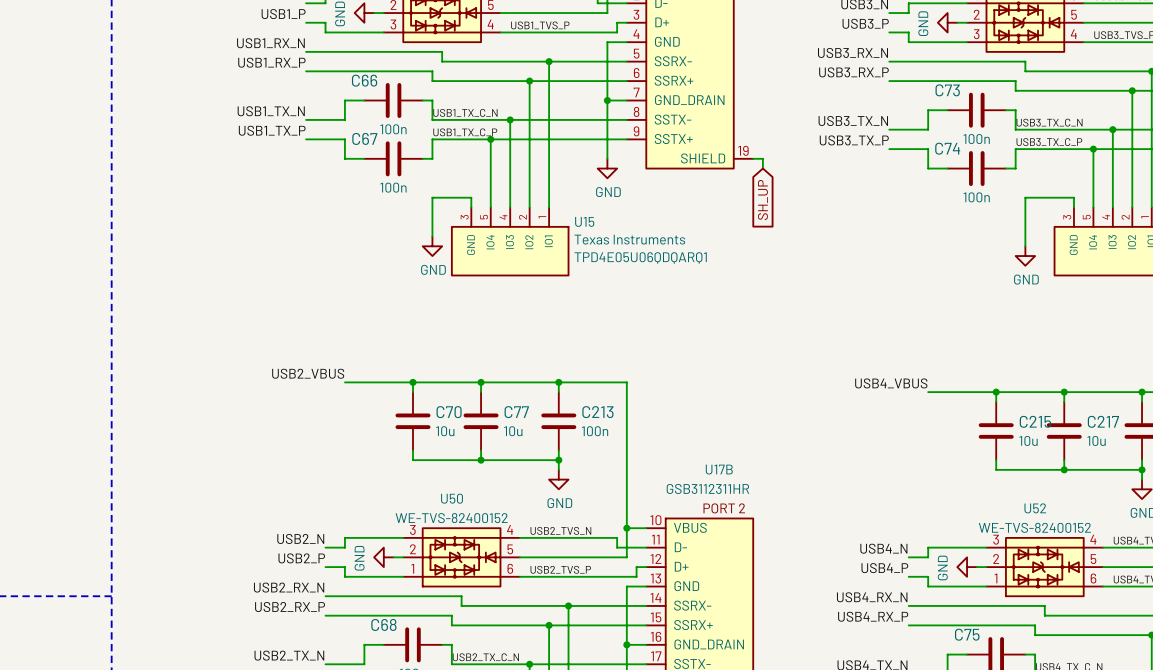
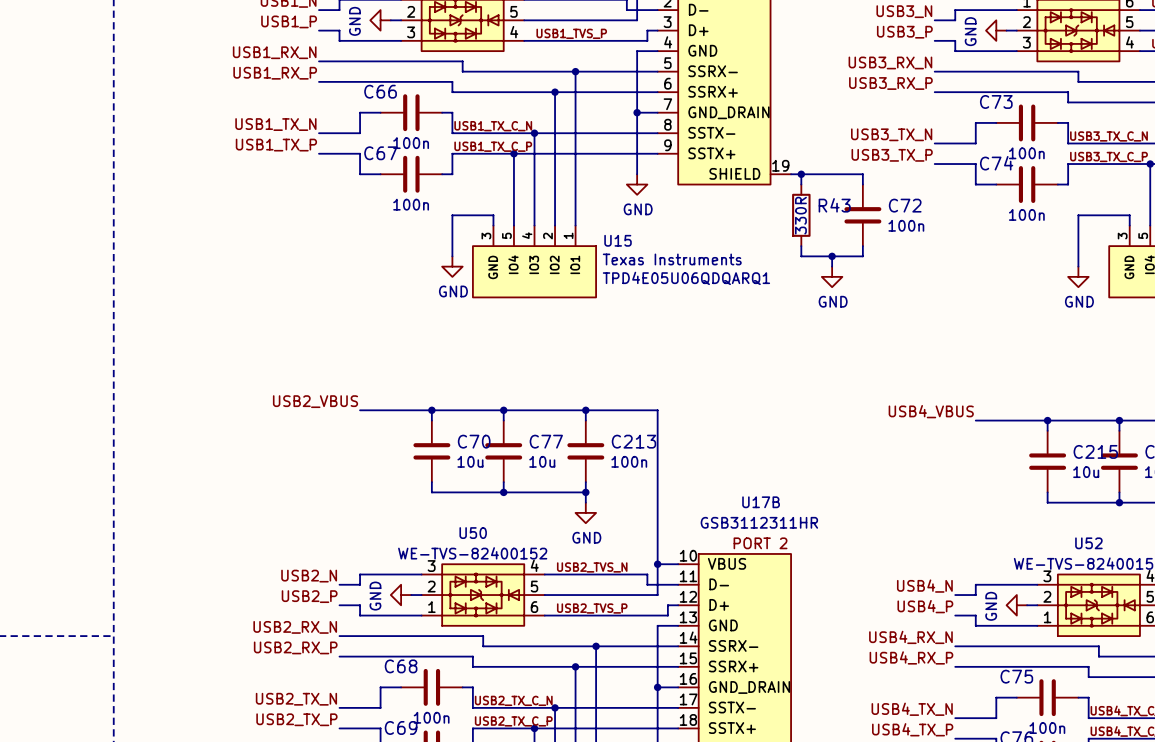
wire: none -> (801, 174) (862, 174) (862, 184)
junction: none -> (801, 174)
R43: none -> (801, 215)
C72: none -> (862, 215)
global label: SH_UP (762, 199) -> none
wire: none -> (801, 246) (801, 256) (862, 256) (862, 246)
wire: none -> (832, 256) (832, 266)
junction: none -> (832, 256)
power symbol: none -> GND (832, 276)

